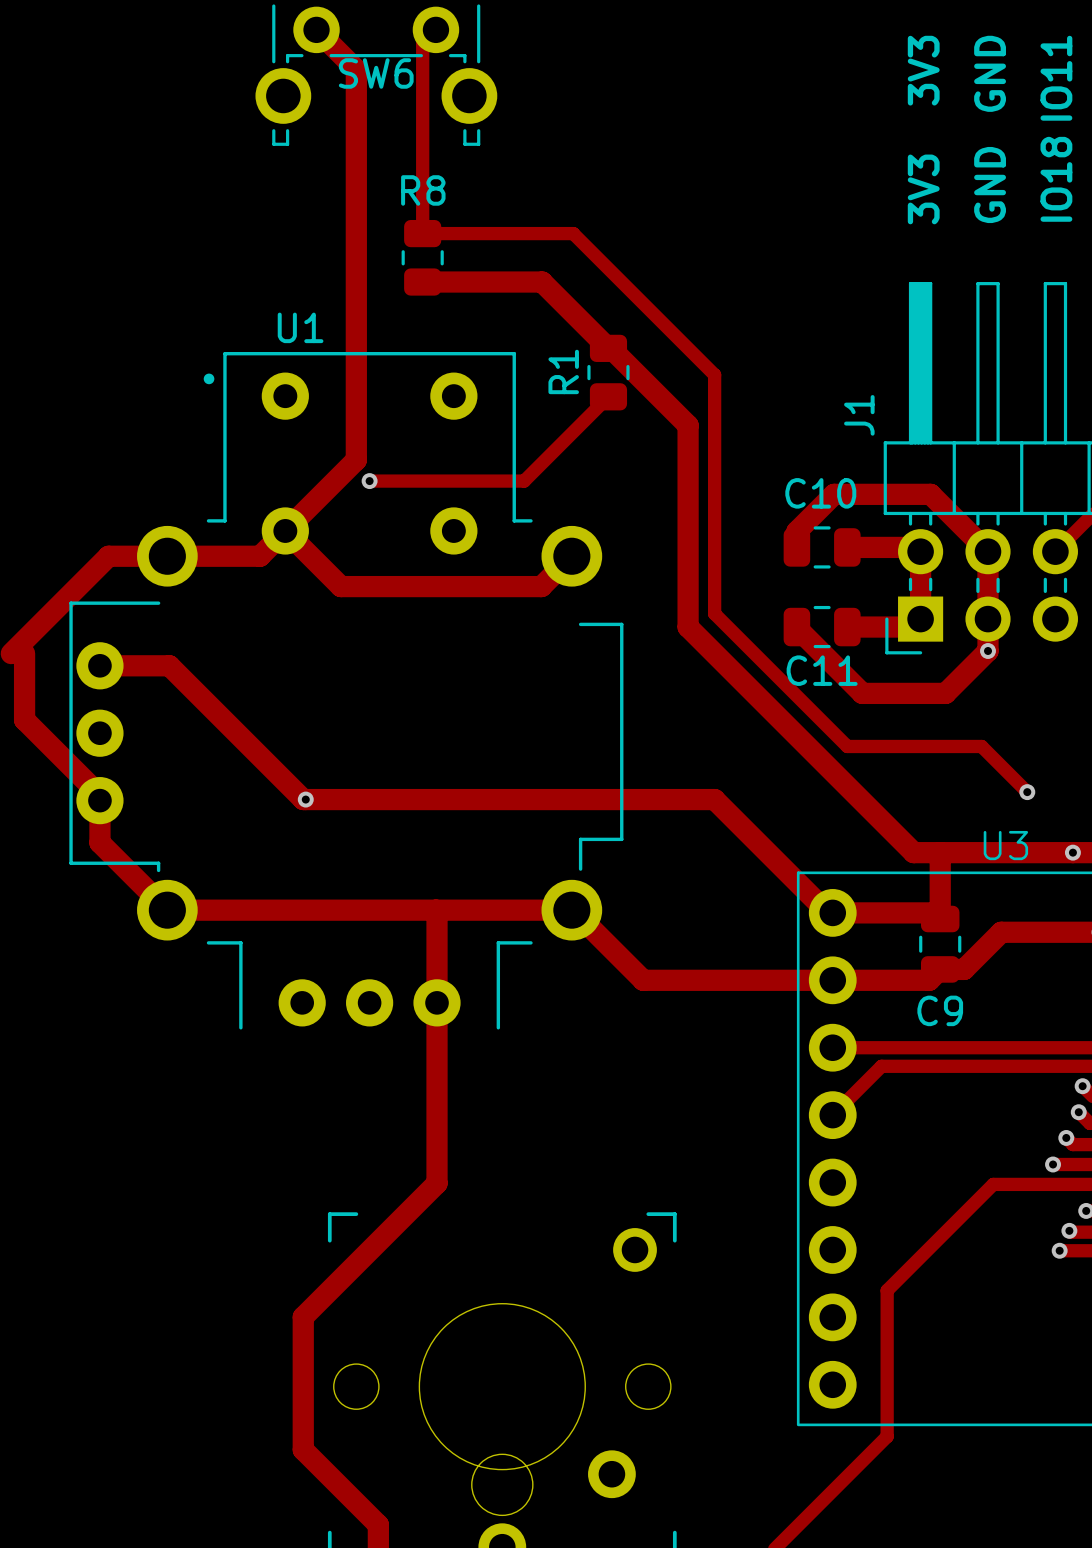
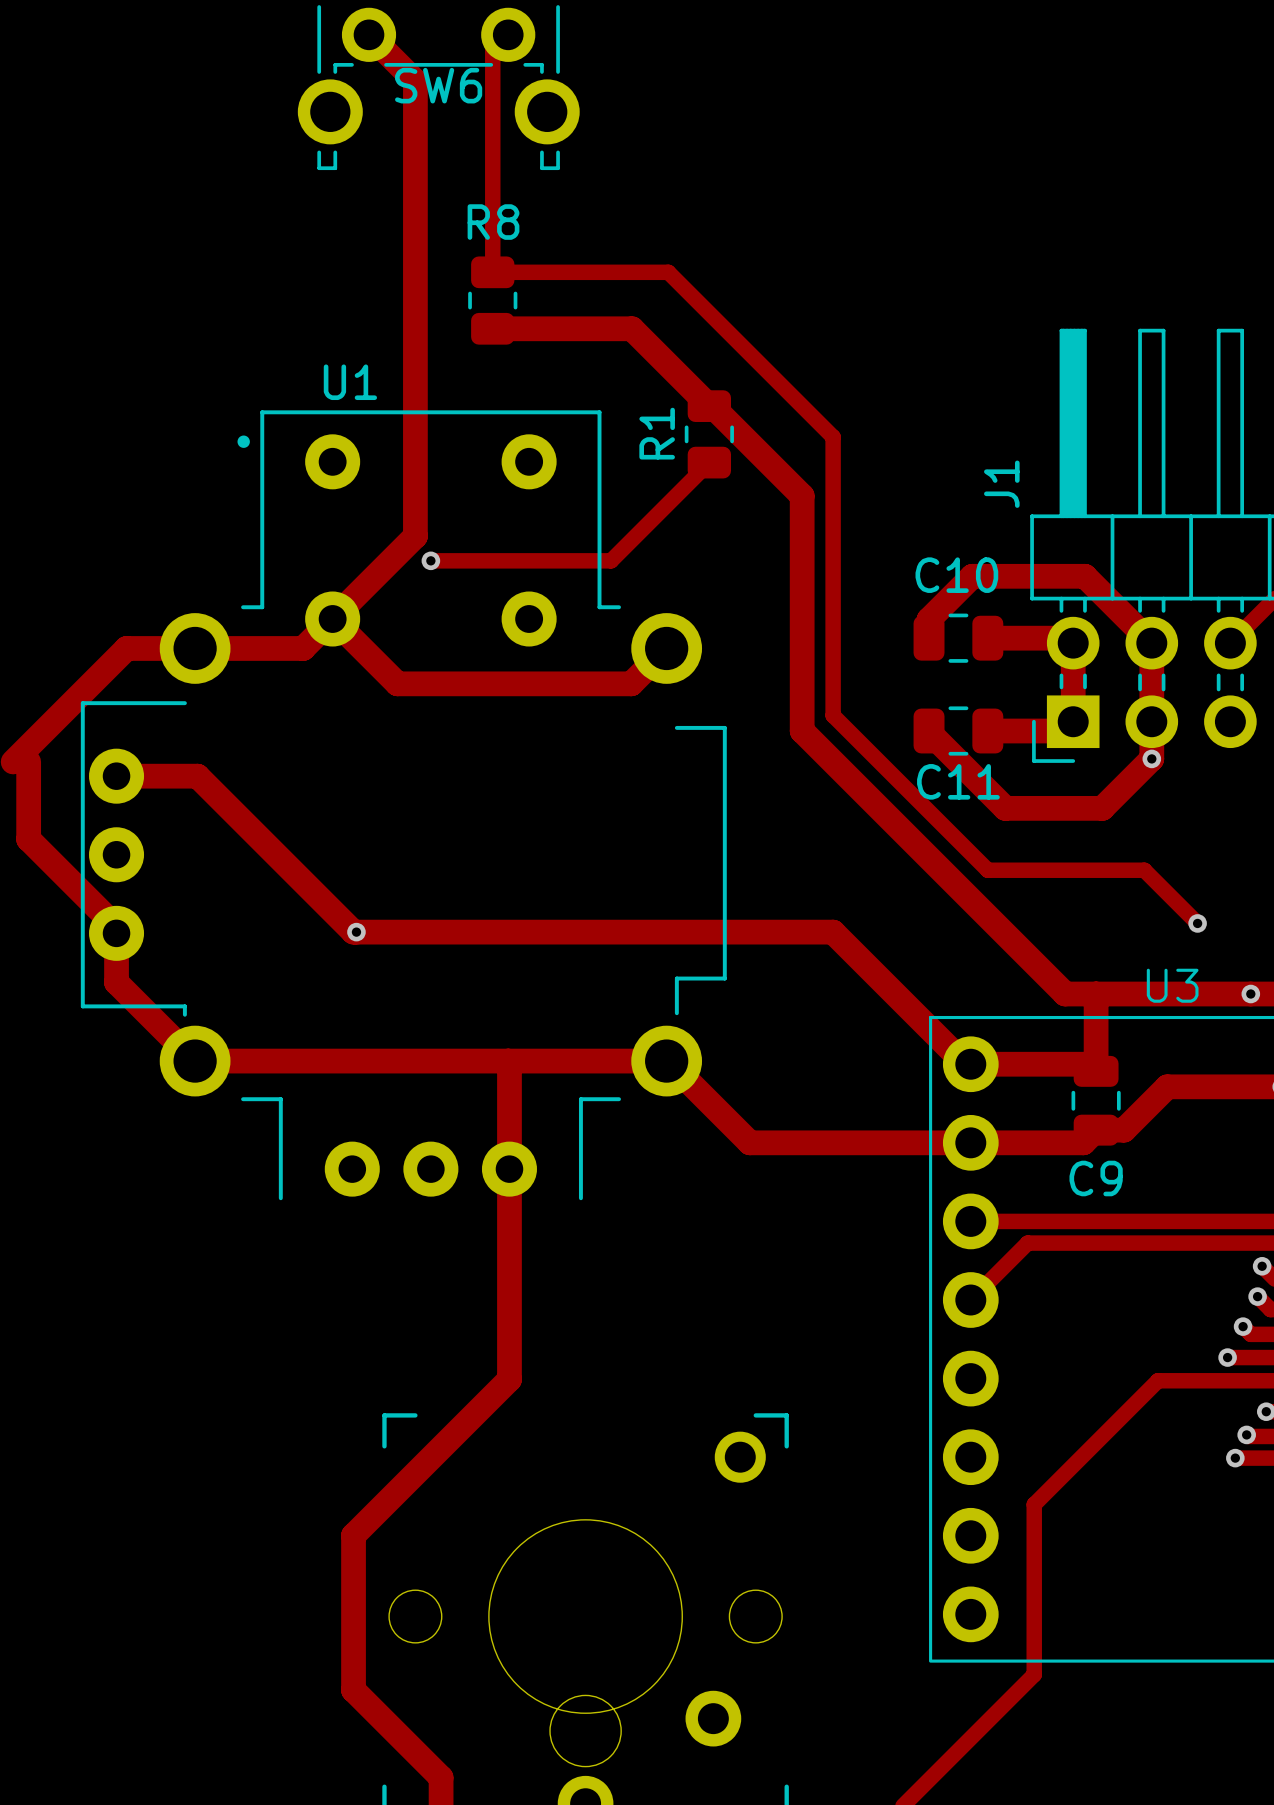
text: 3V3 (923, 70) -> none
text: GND (990, 73) -> none
text: IO11 (1056, 78) -> none
text: IO18 (1056, 179) -> none
text: GND (990, 185) -> none
text: 3V3 (923, 189) -> none

